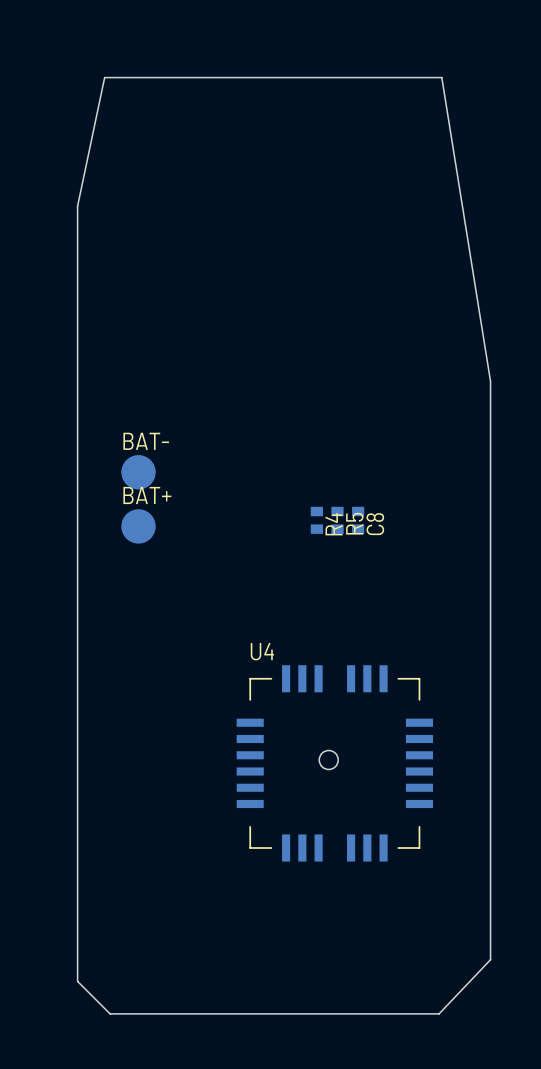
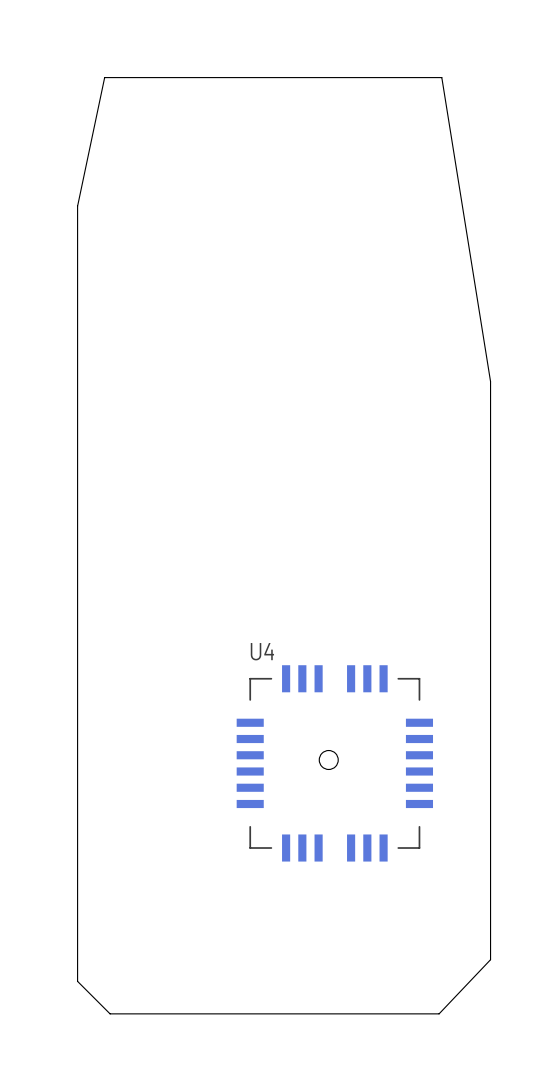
BAT-: (138, 472) -> none
R4: (316, 520) -> none
R5: (337, 520) -> none
C8: (358, 520) -> none
BAT+: (138, 526) -> none

